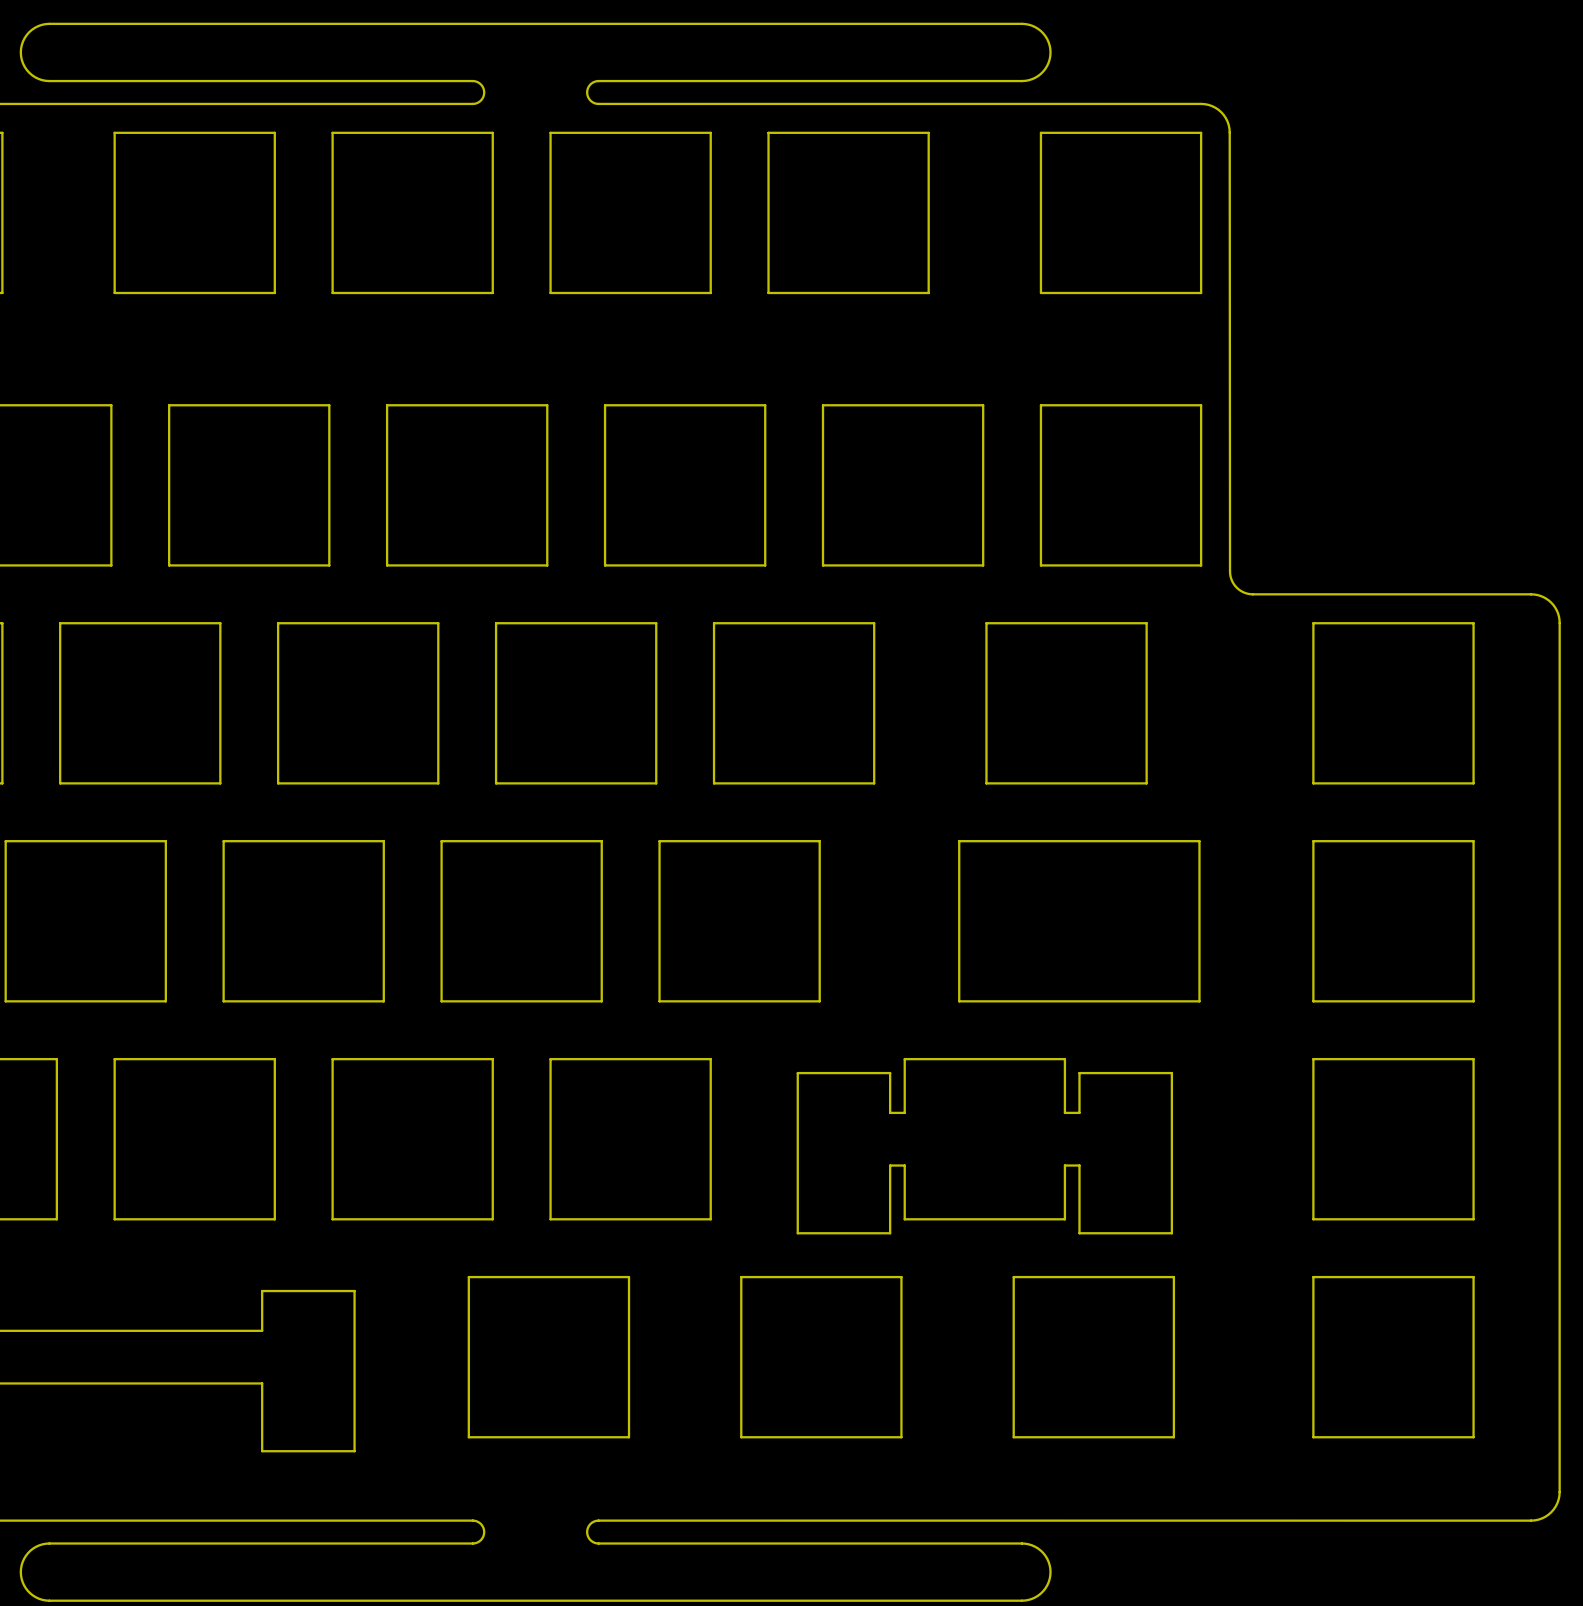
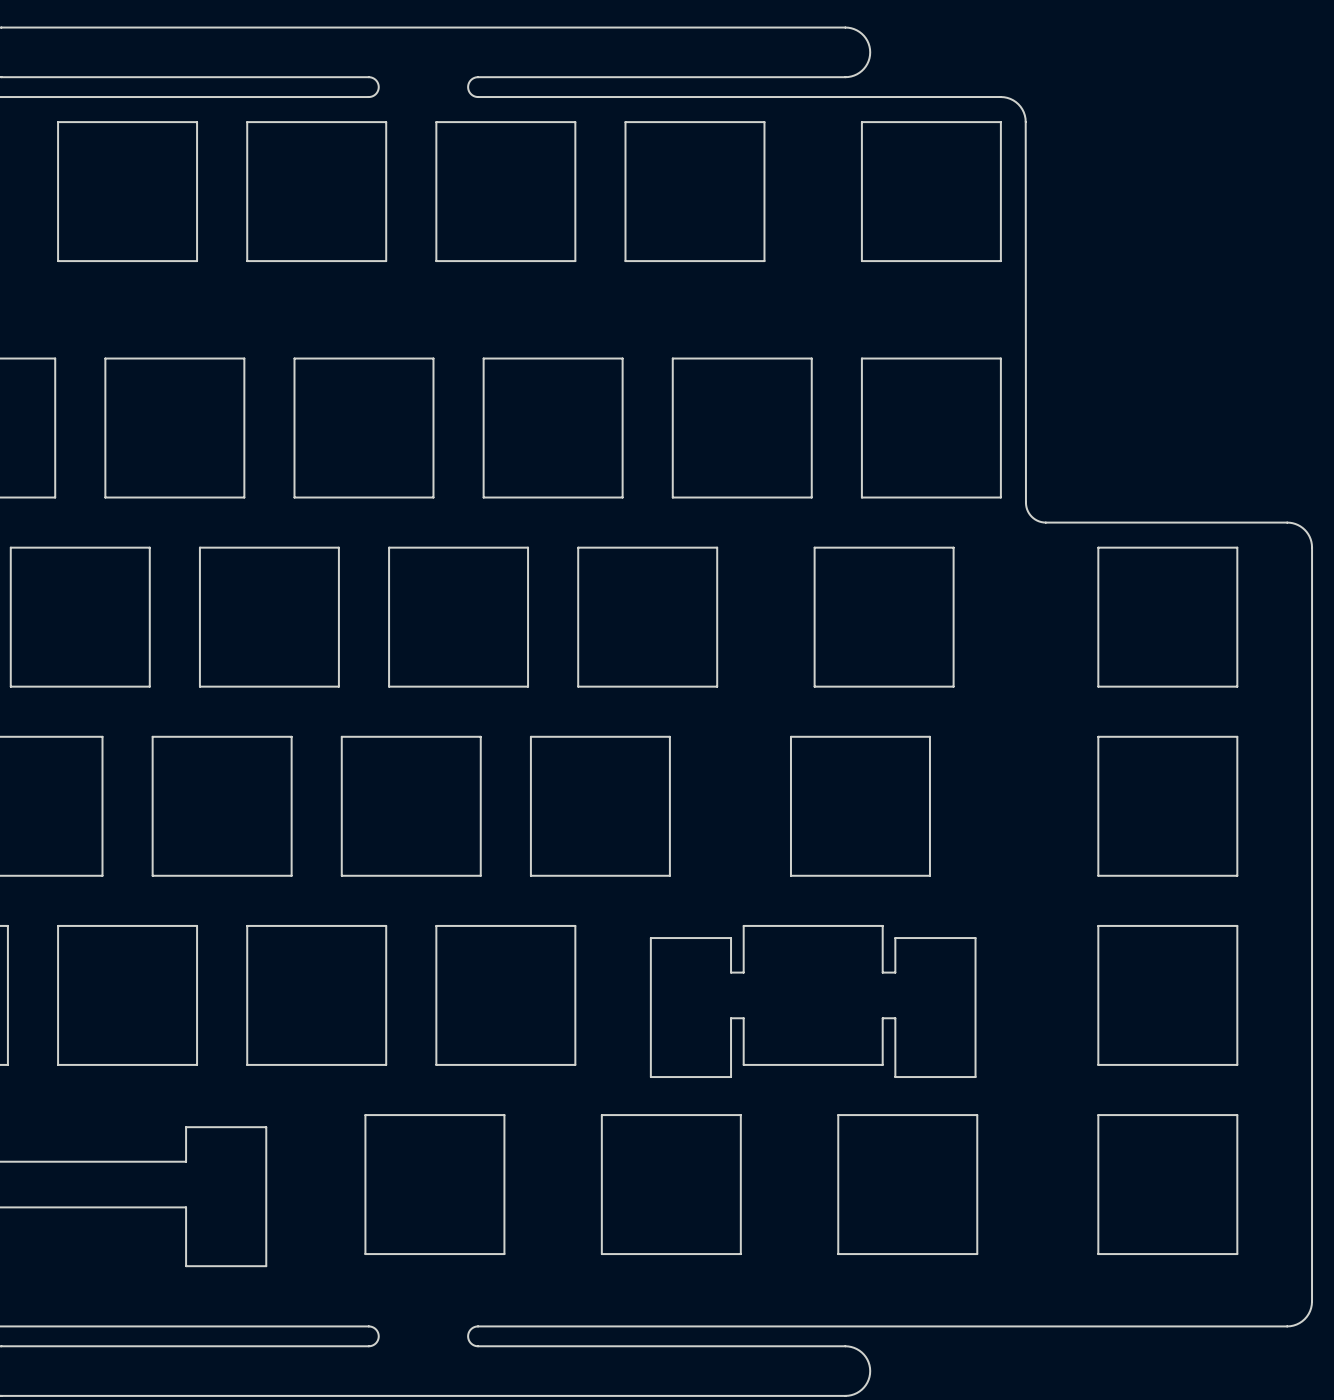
board edge: (959, 841) (1199, 841) (1199, 1001) (1119, 1001) -> (790, 736) (929, 736) (929, 875)

